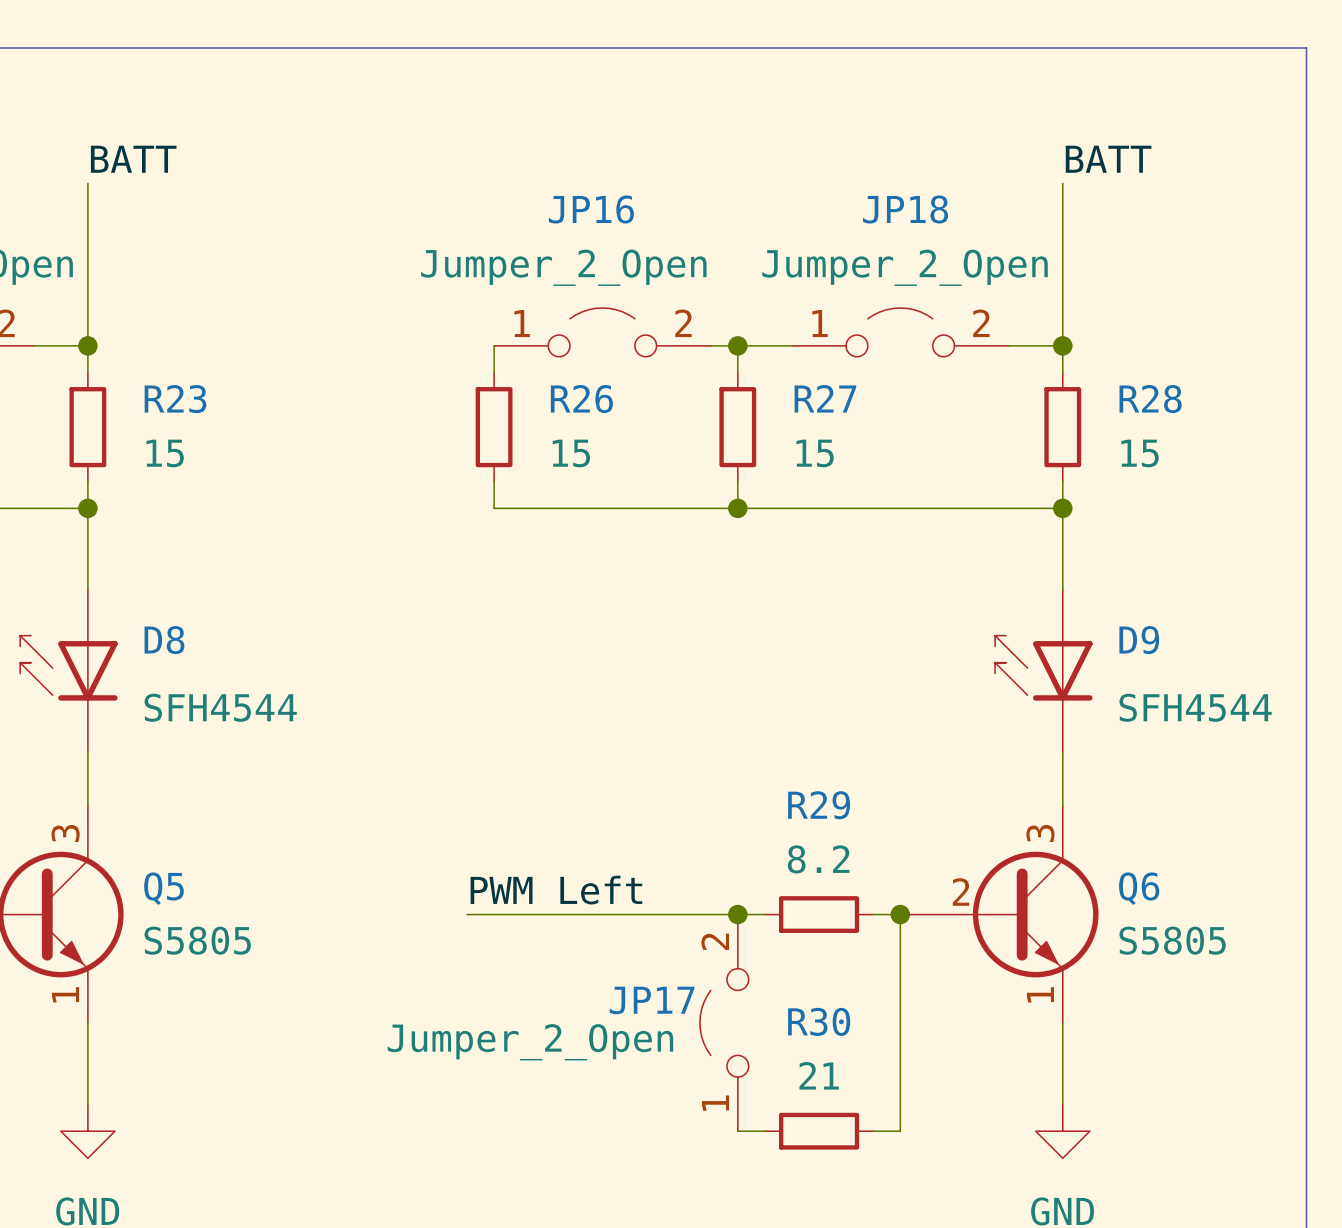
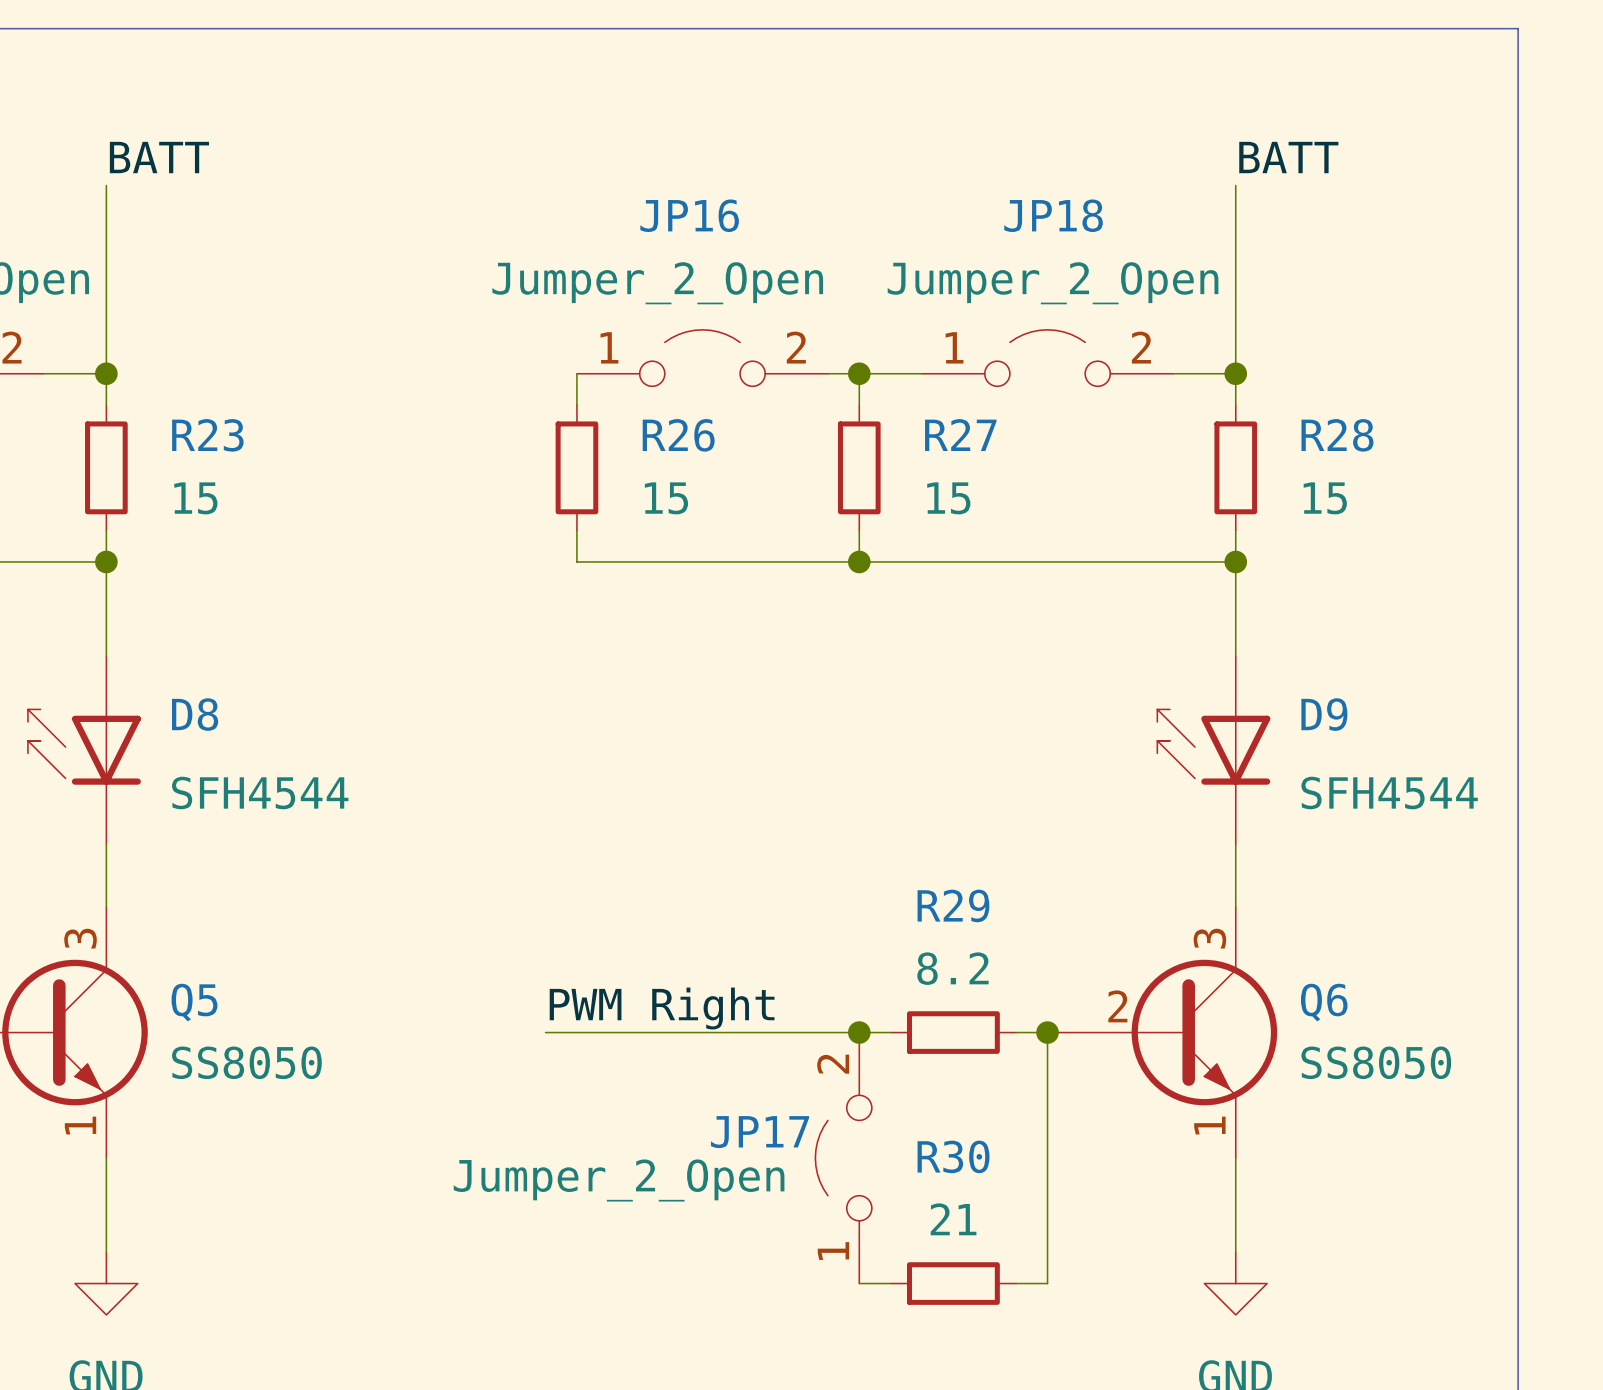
label: PWM Left (556, 890) -> PWM Right (662, 1008)
Q5 value: S5805 (197, 940) -> SS8050 (246, 1062)
Q6 value: S5805 (1172, 940) -> SS8050 (1376, 1062)

